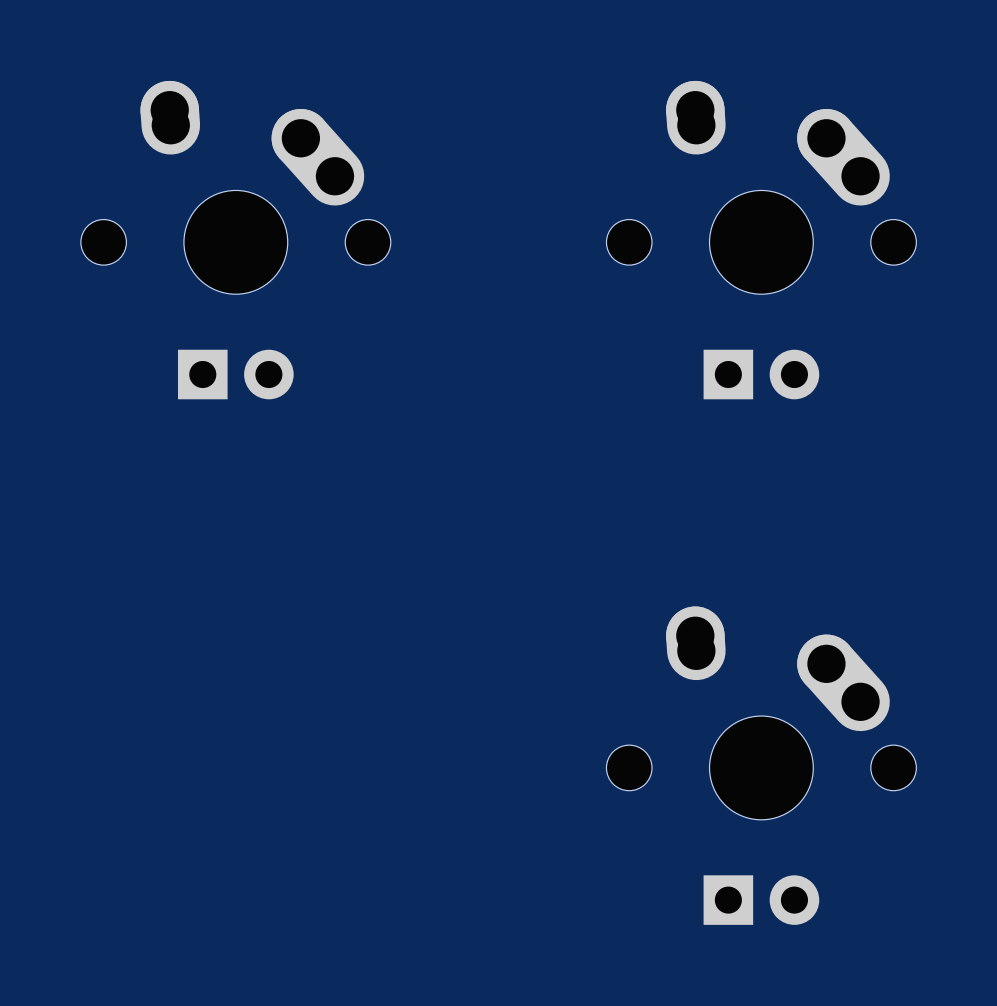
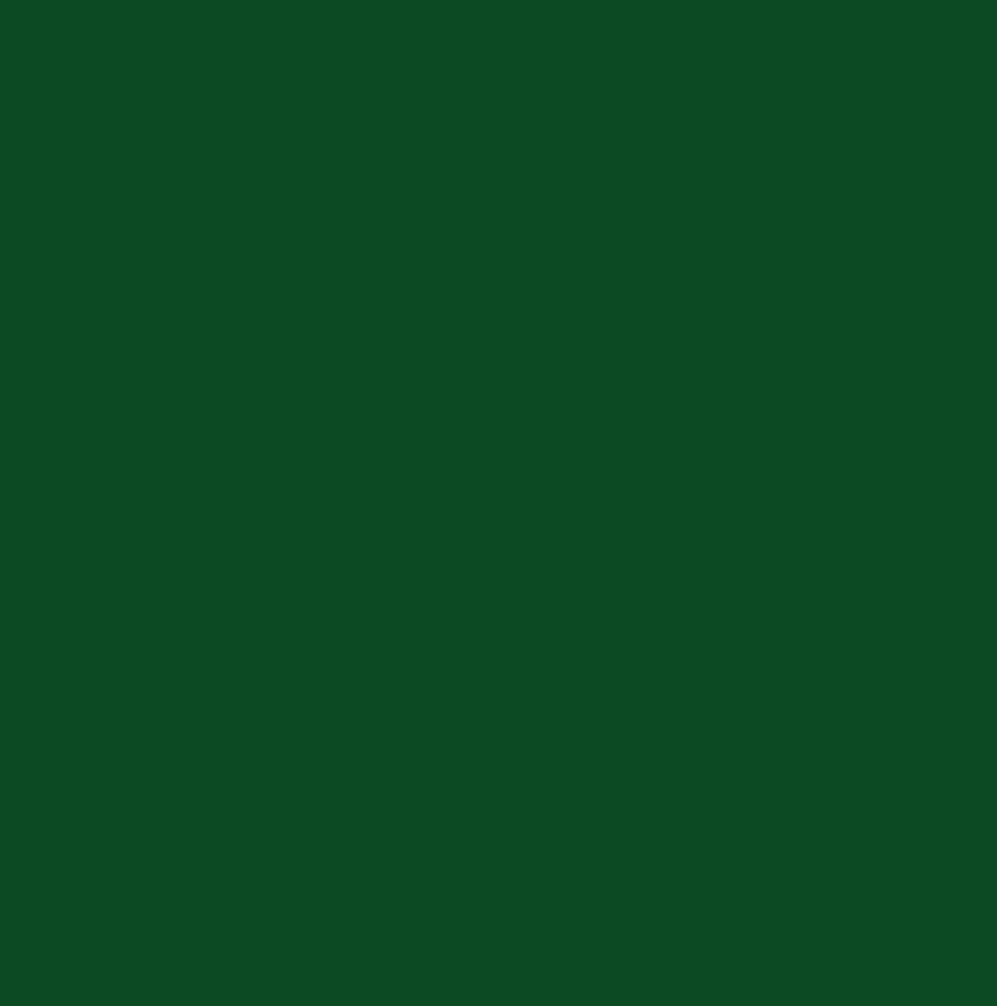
part: (235, 240) -> none
part: (761, 240) -> none
part: (761, 765) -> none

